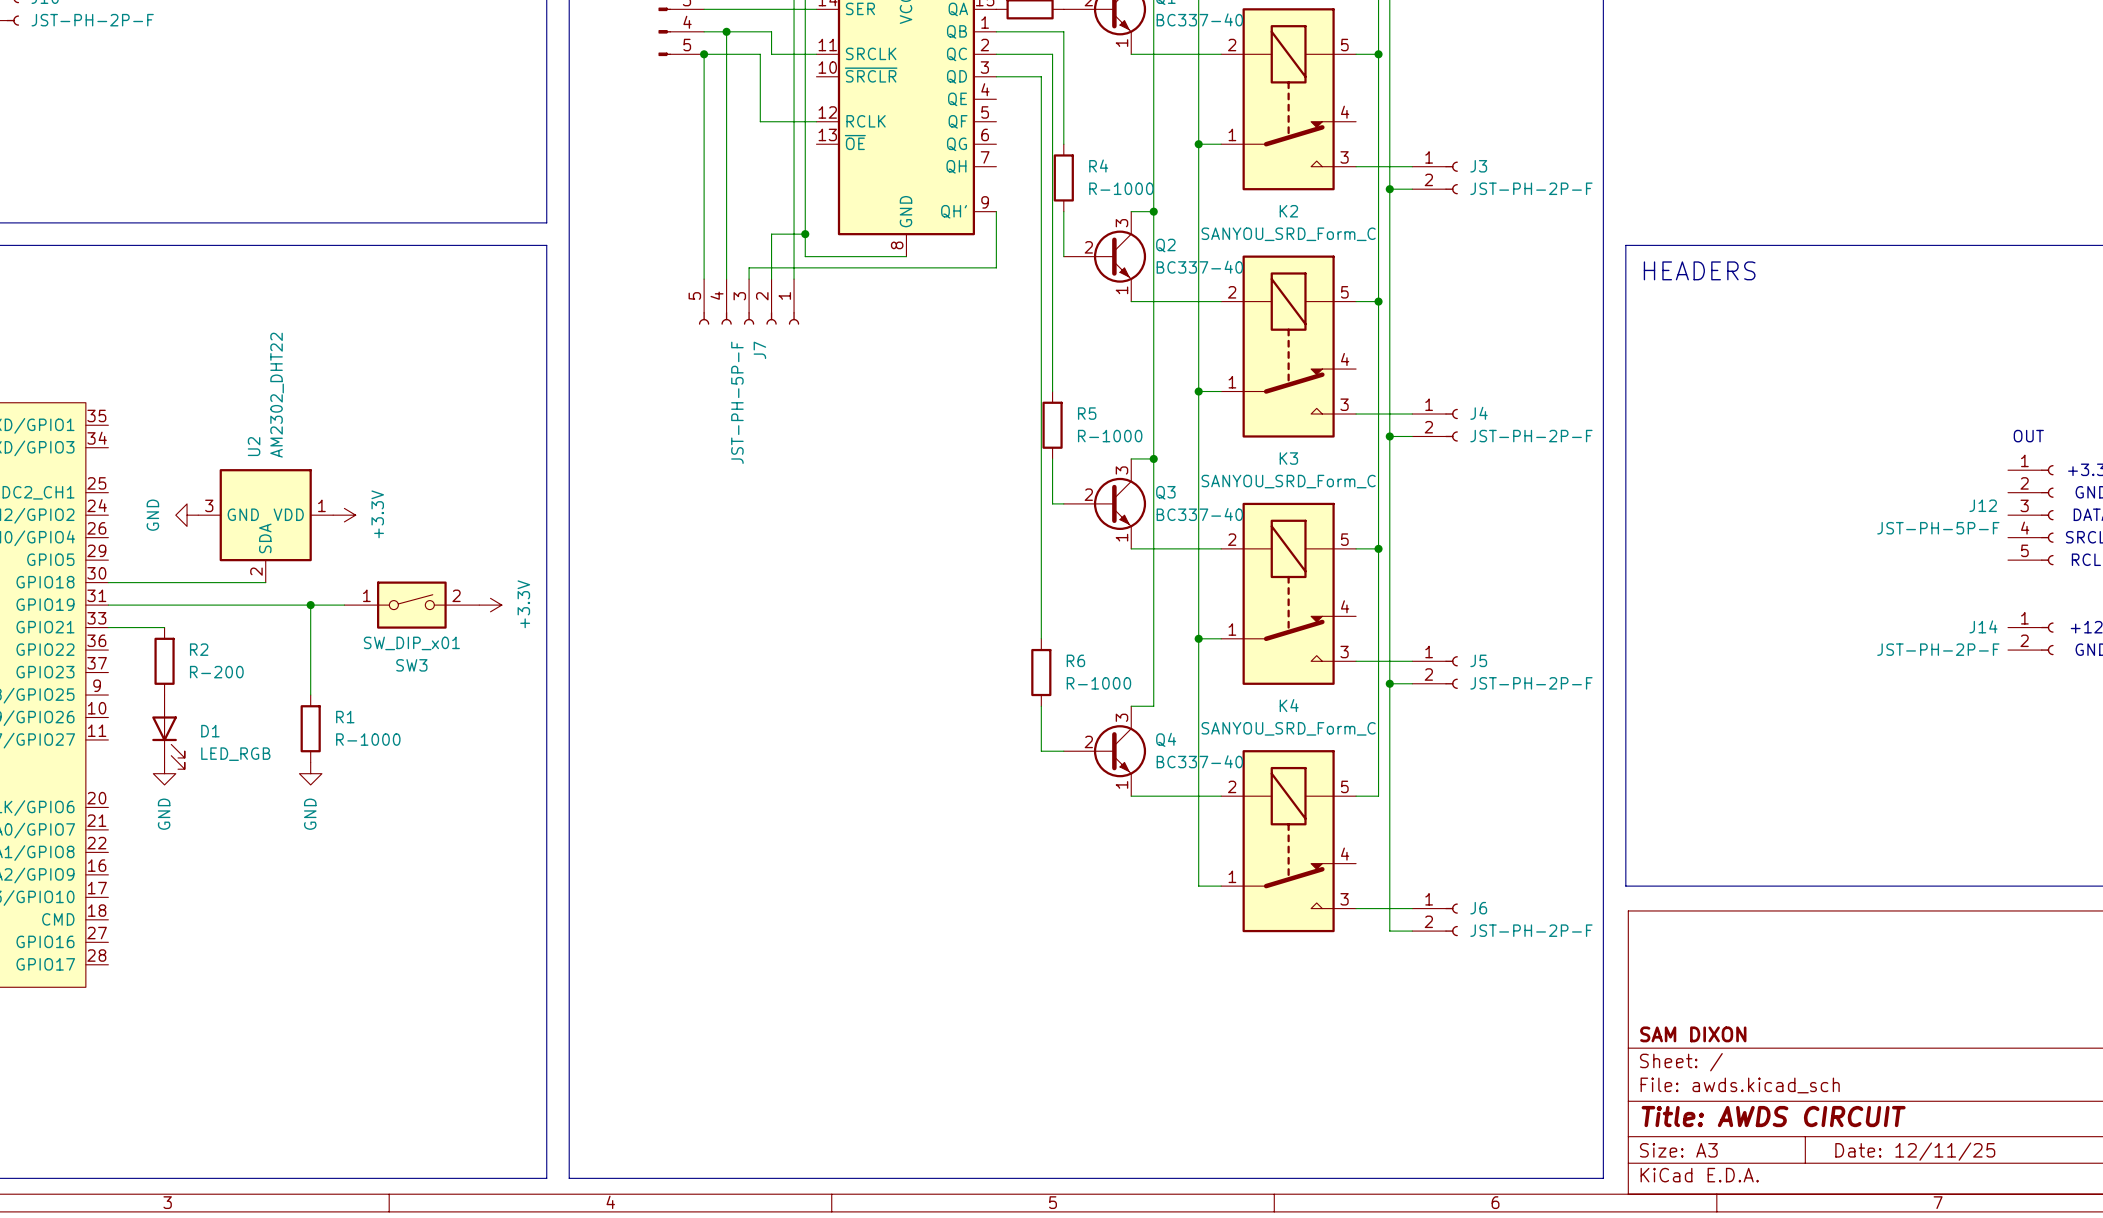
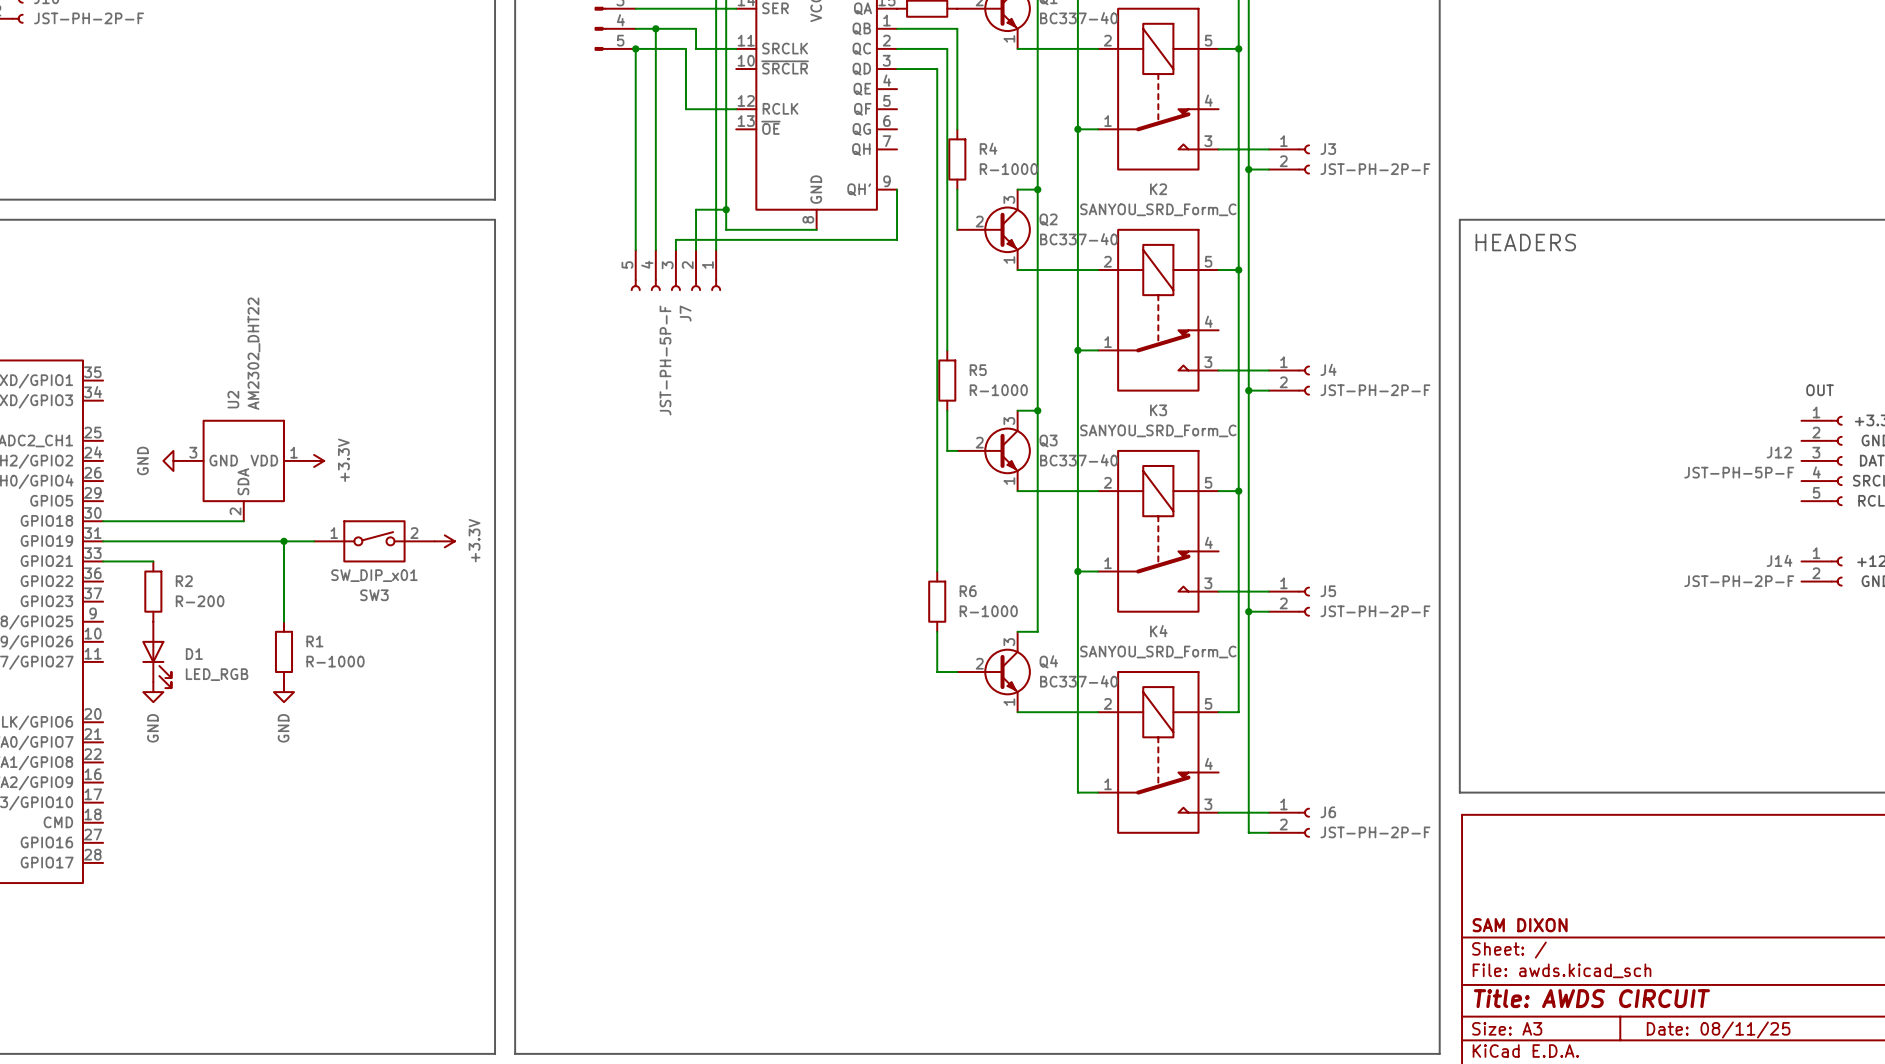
title block: Date: 12/11/25 (1915, 1151) -> Date: 08/11/25 (1718, 1029)

